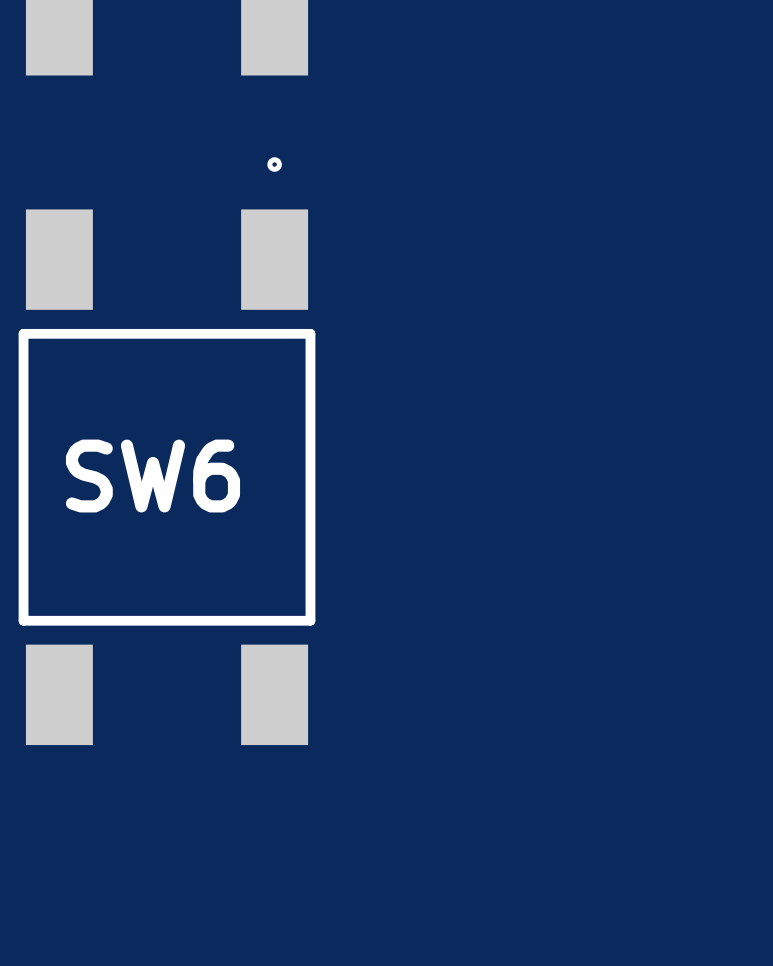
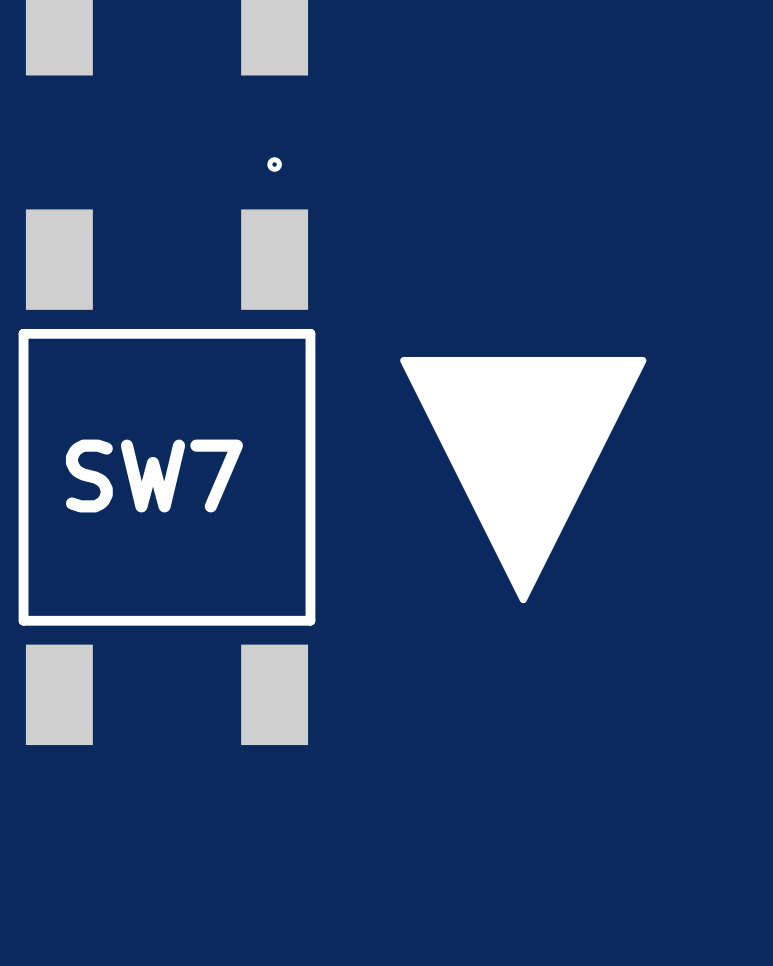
drawing: none -> [400, 356, 647, 604]
SW6 name: SW6 (152, 476) -> SW7 (154, 476)

